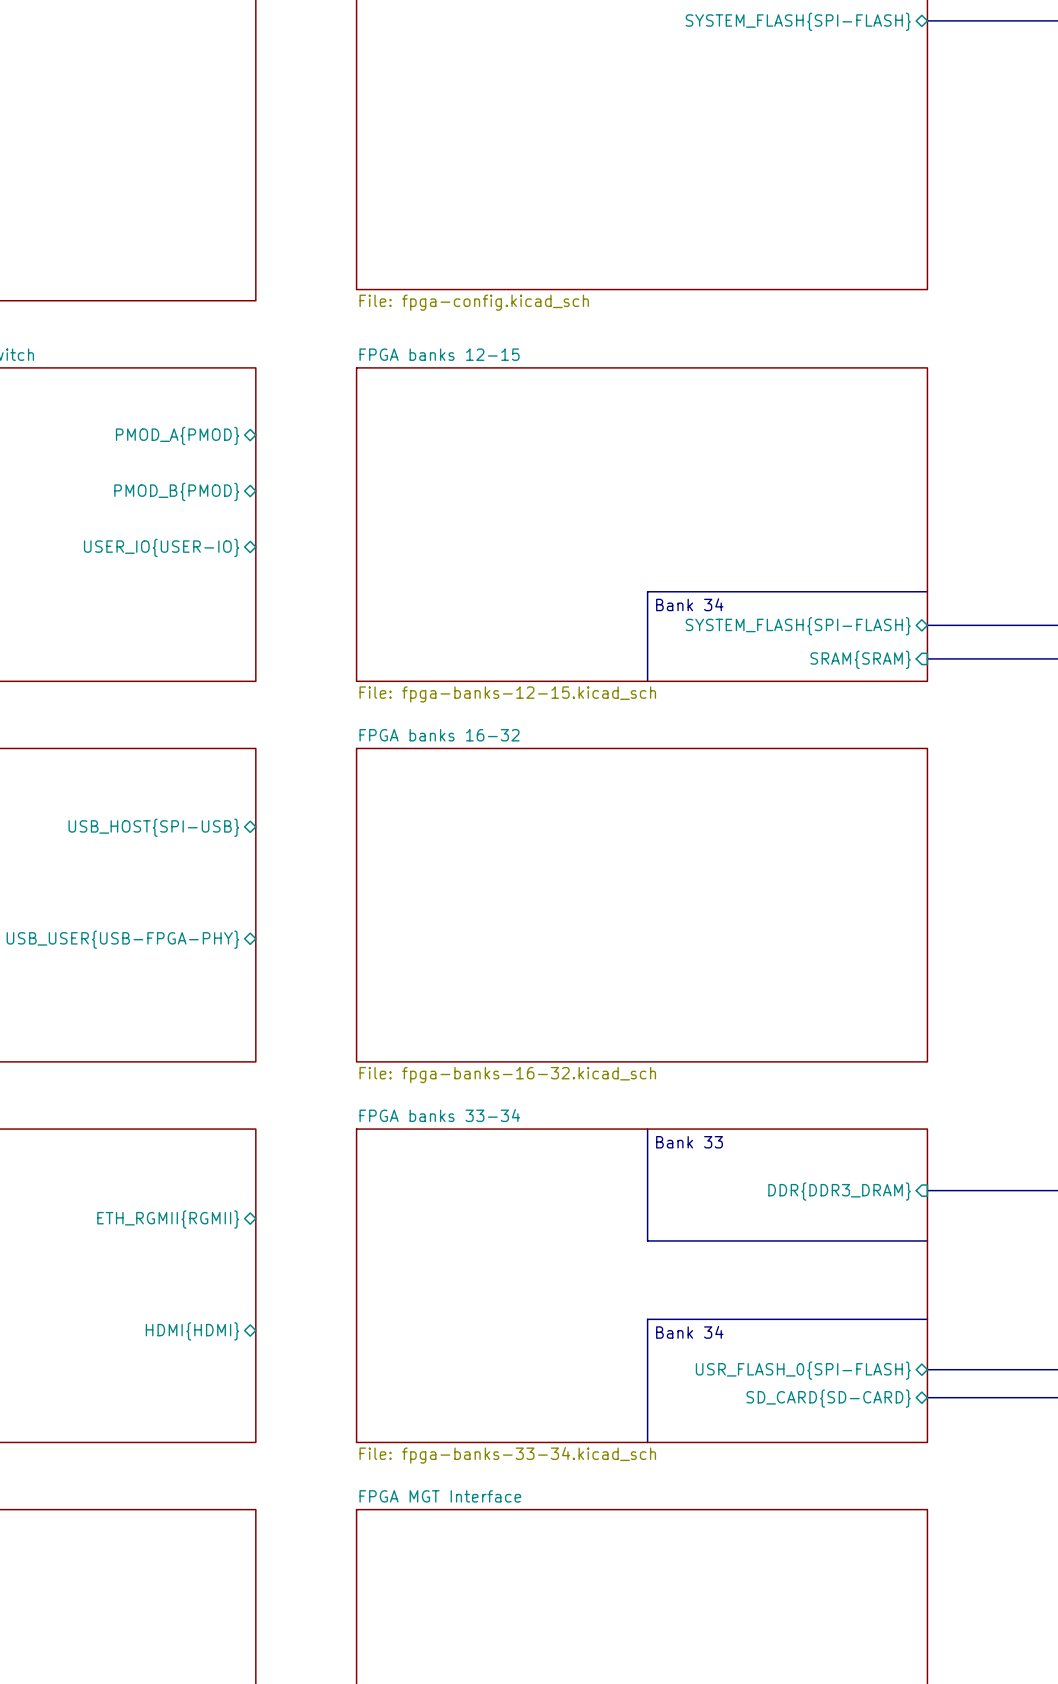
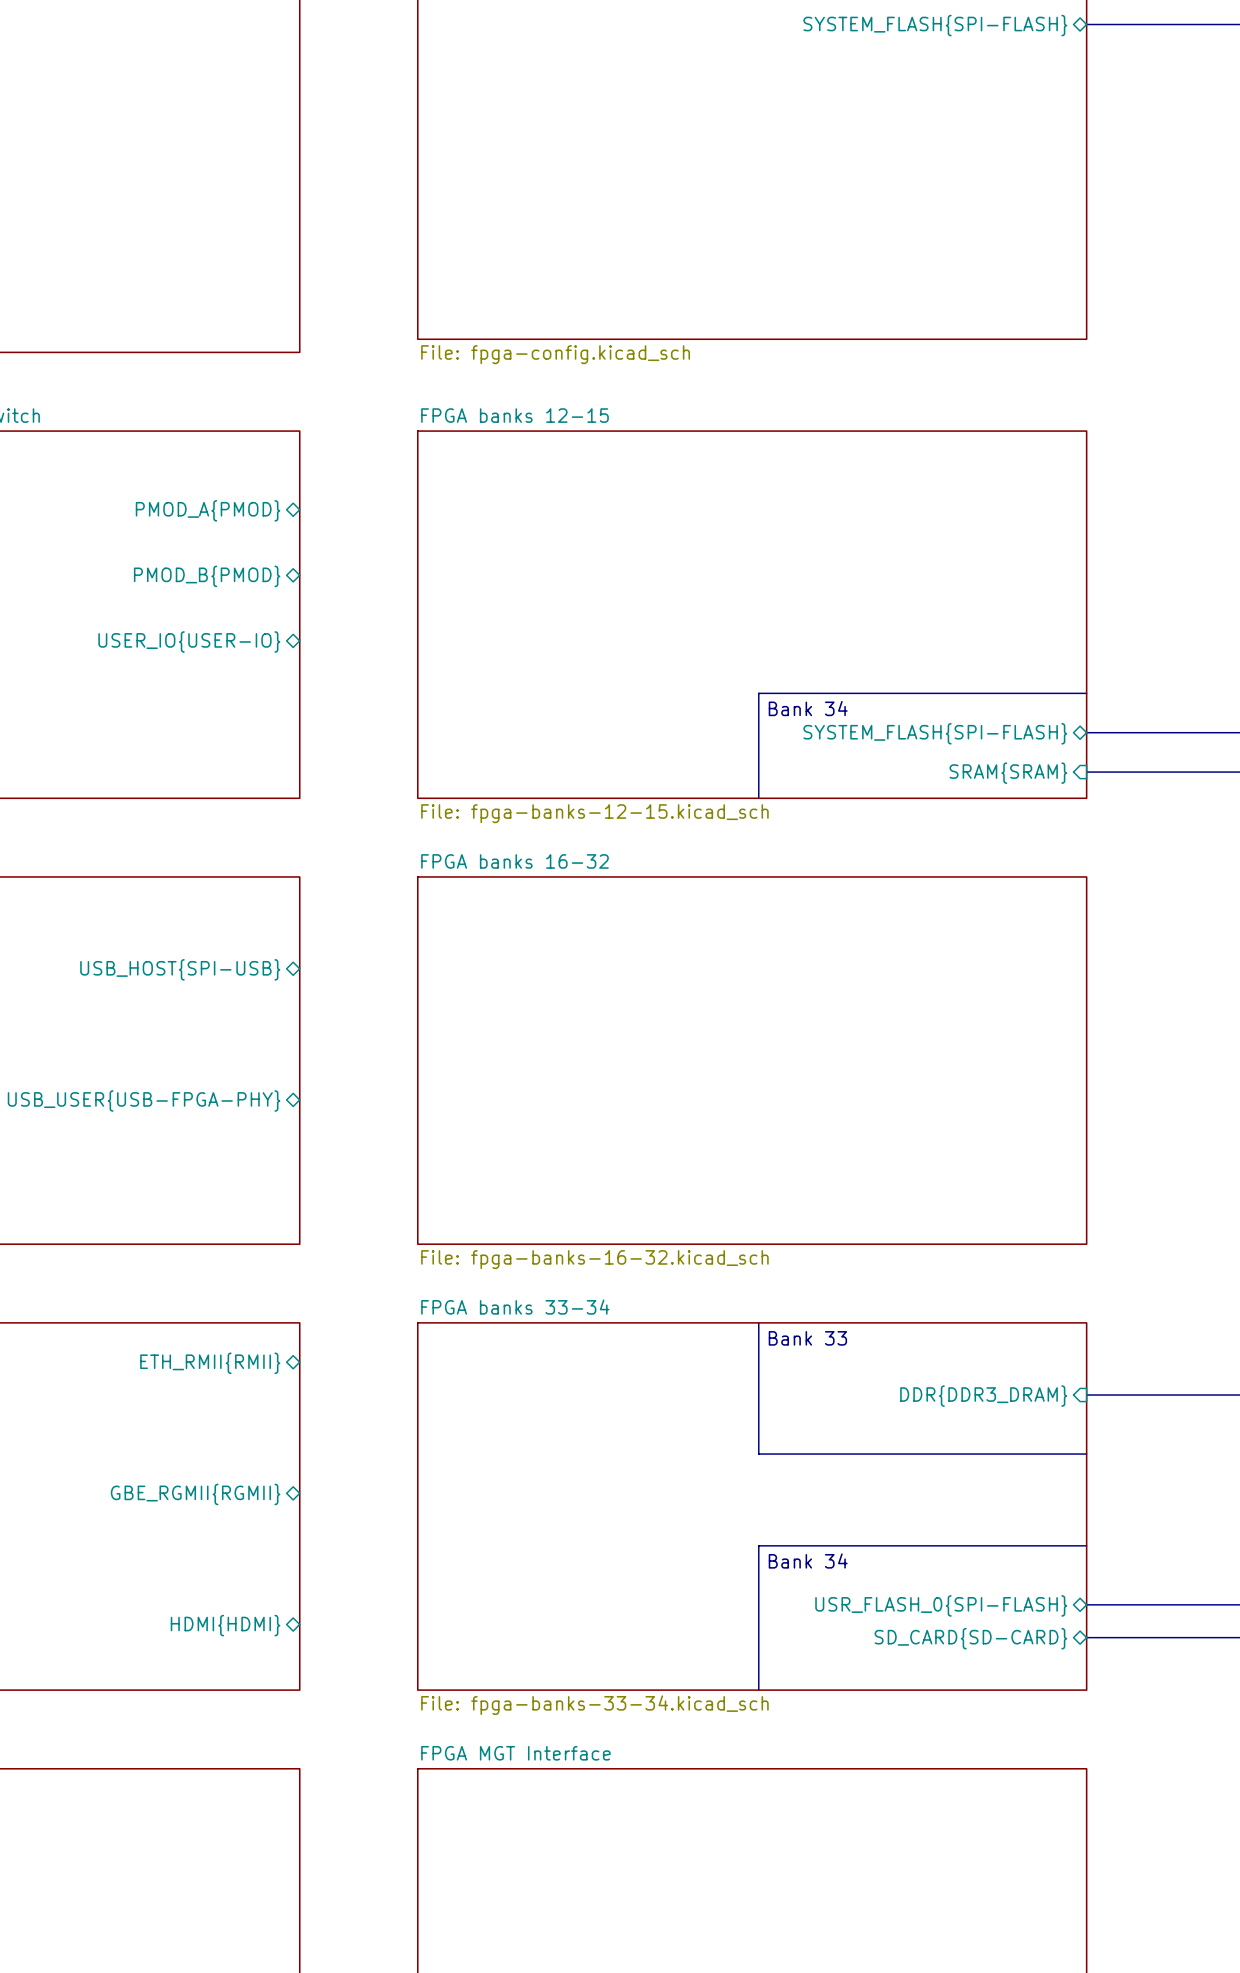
sheet pin: none -> ETH_RMII{RMII} (210, 1363)
sheet pin: ETH_RGMII{RGMII} (168, 1219) -> none
sheet pin: none -> GBE_RGMII{RGMII} (195, 1494)
sheet pin position: HDMI{HDMI} (192, 1331) -> HDMI{HDMI} (225, 1625)

